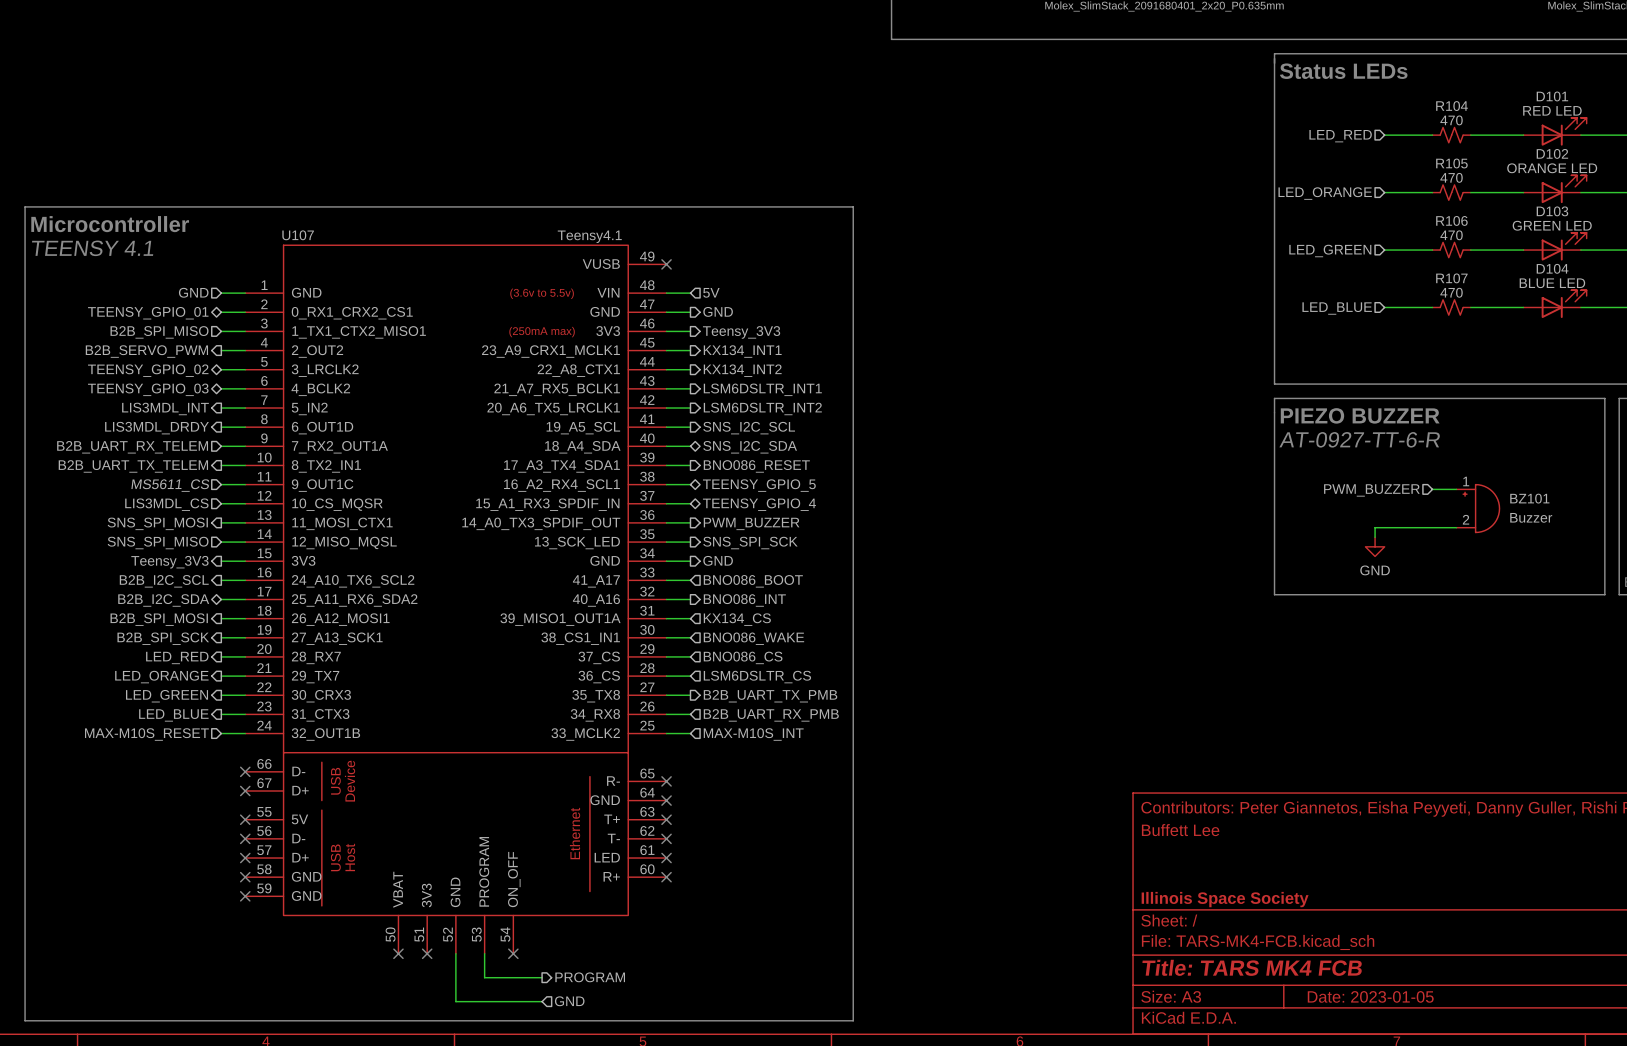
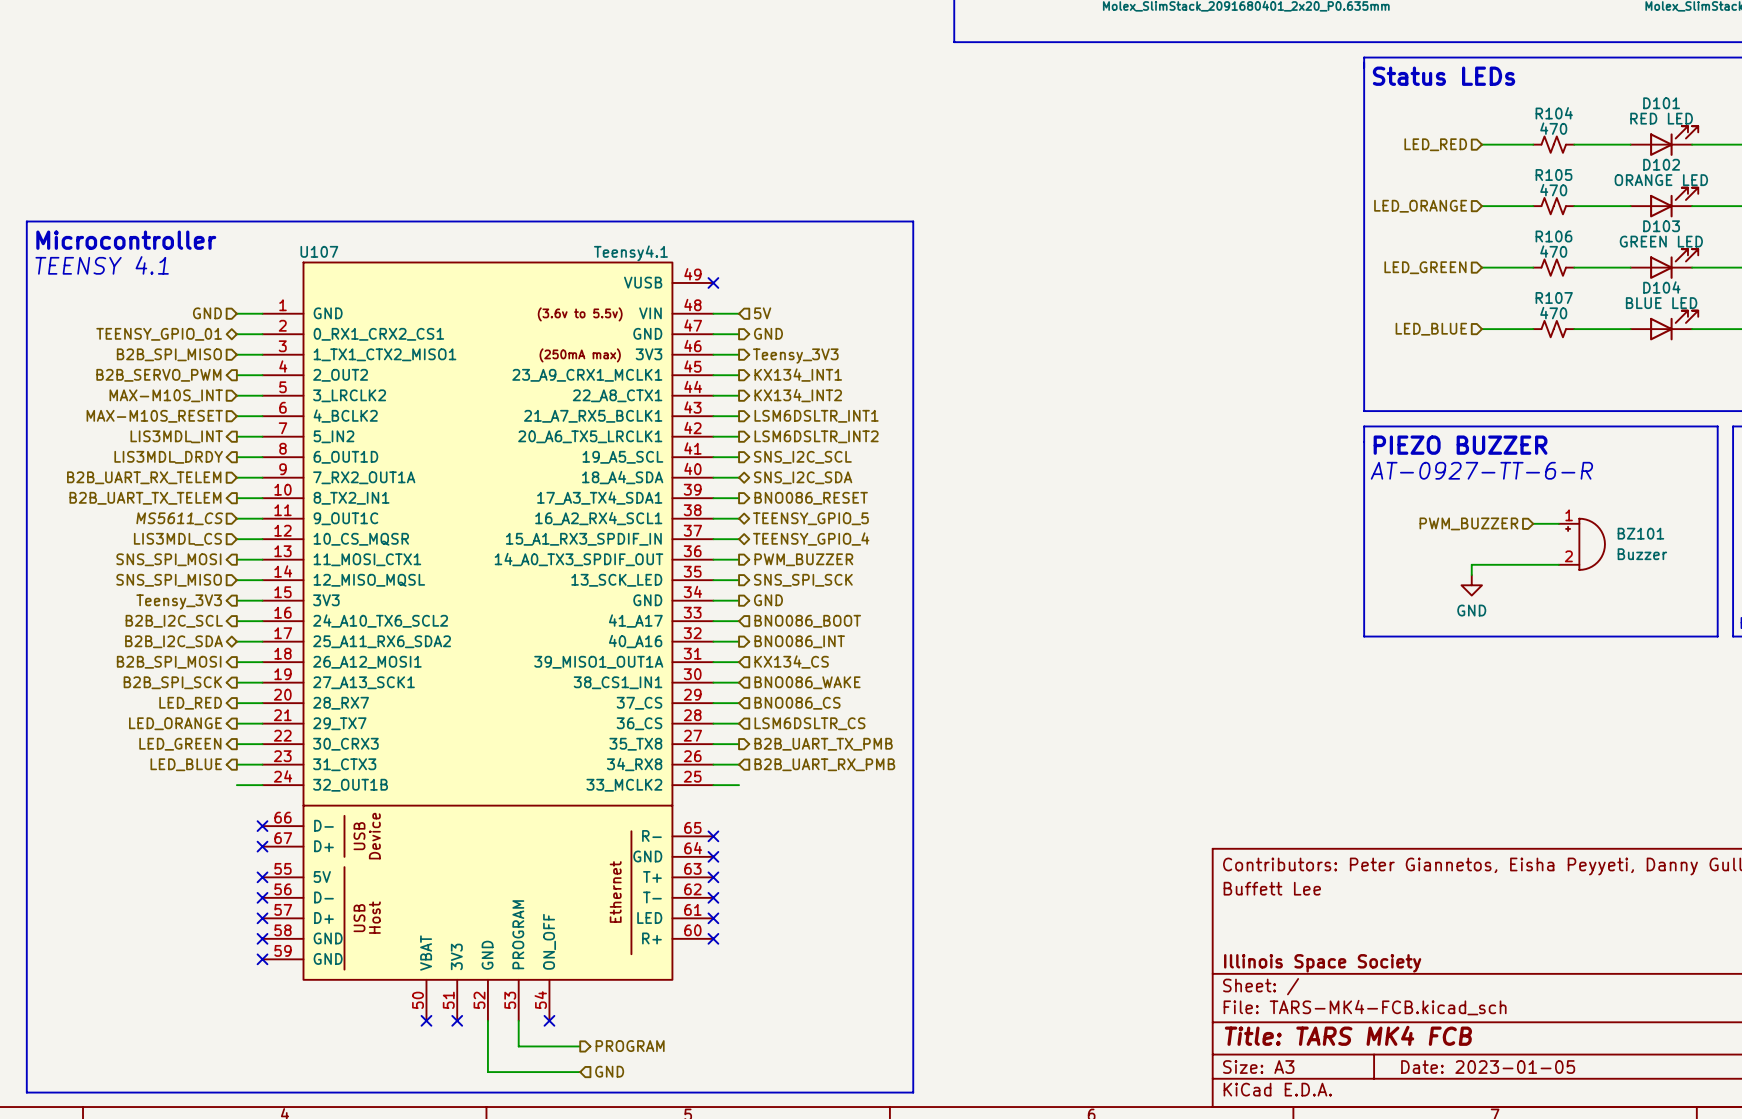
hierarchical label shape: bidirectional (148, 370) -> input (166, 395)
hierarchical label: TEENSY_GPIO_02 (148, 370) -> MAX-M10S_INT (166, 395)
hierarchical label shape: bidirectional (148, 389) -> input (154, 416)
hierarchical label: TEENSY_GPIO_03 (148, 389) -> MAX-M10S_RESET (154, 416)
hierarchical label: MAX-M10S_RESET (146, 734) -> none
hierarchical label: MAX-M10S_INT (753, 734) -> none

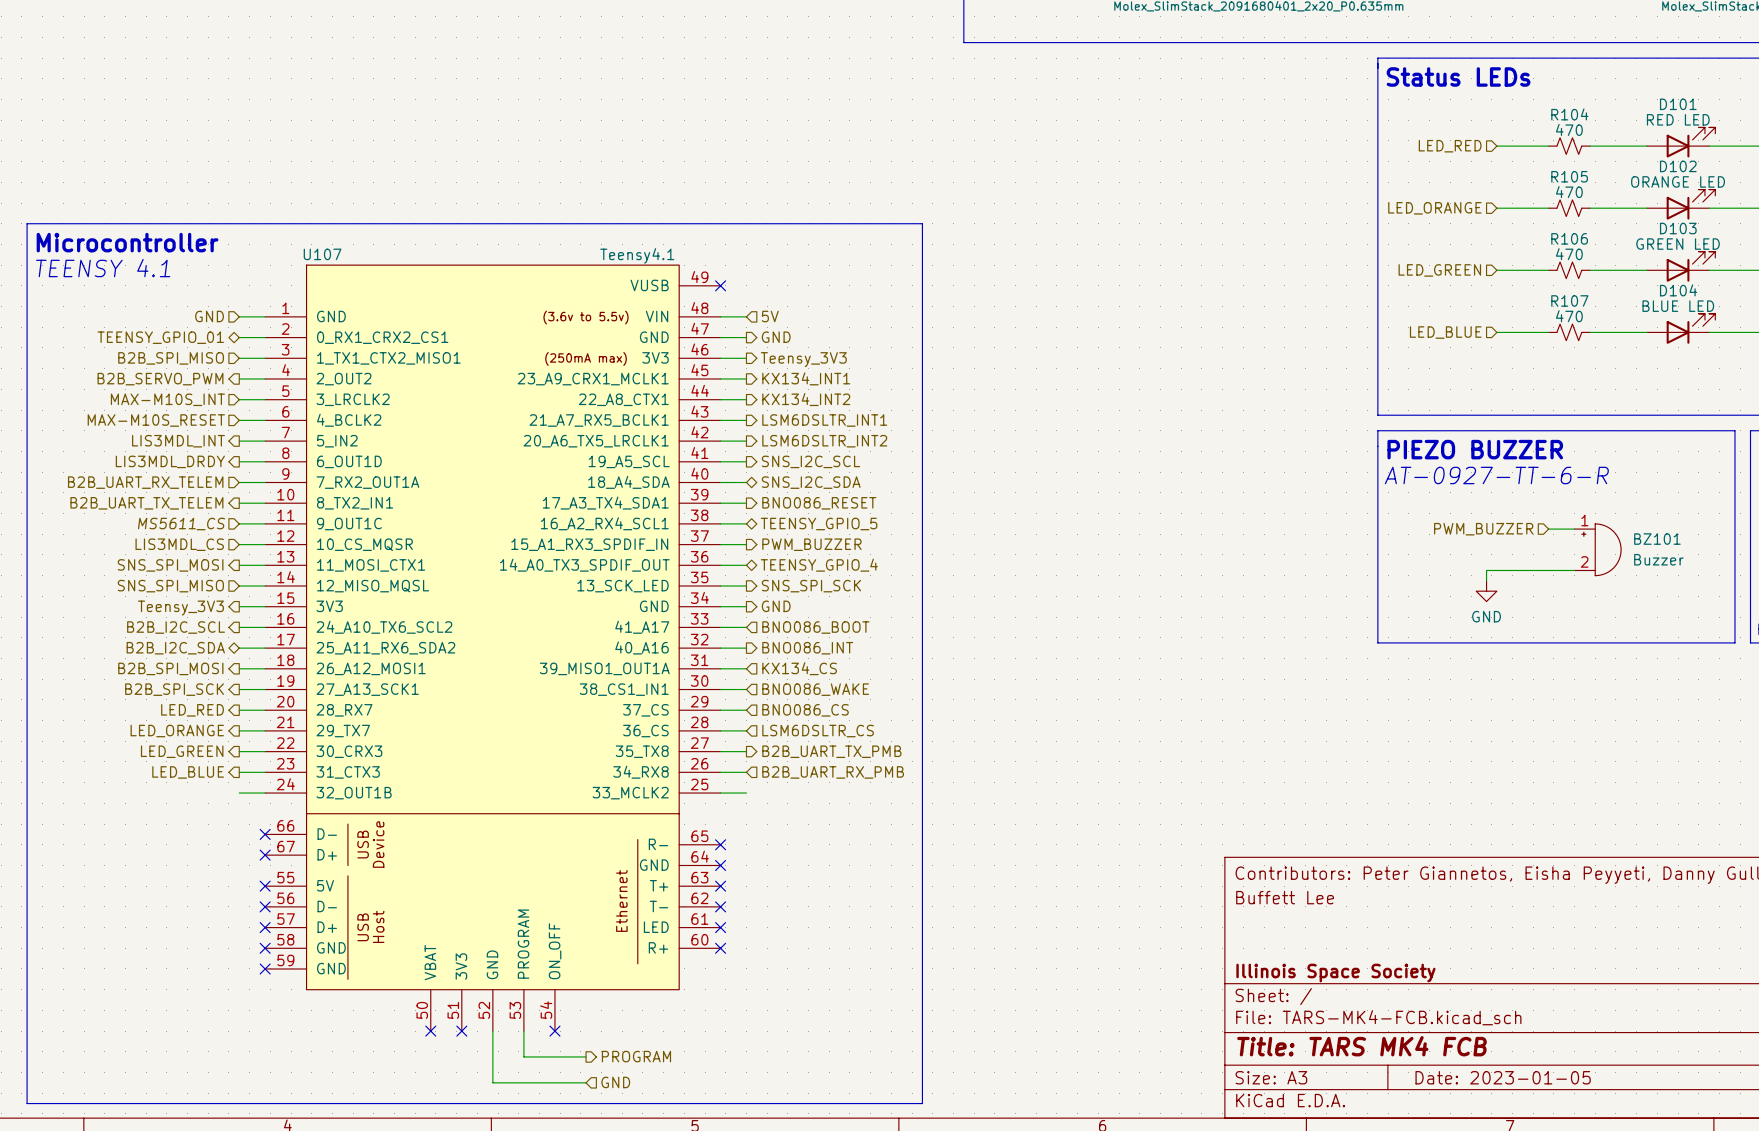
hierarchical label shape: bidirectional (811, 539) -> output (811, 544)
hierarchical label: TEENSY_GPIO_4 (811, 539) -> PWM_BUZZER (811, 544)
hierarchical label shape: output (803, 559) -> bidirectional (819, 565)
hierarchical label: PWM_BUZZER (803, 559) -> TEENSY_GPIO_4 (819, 565)

